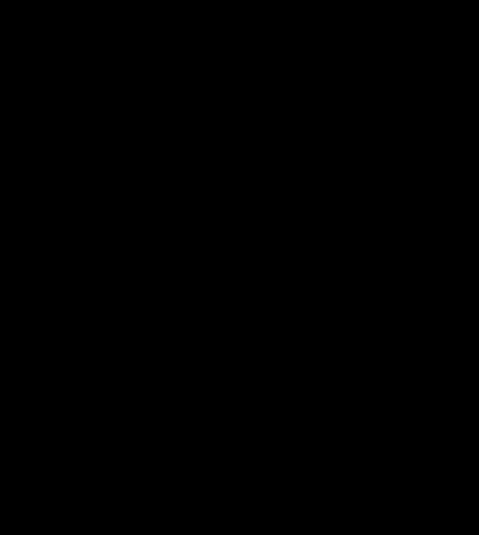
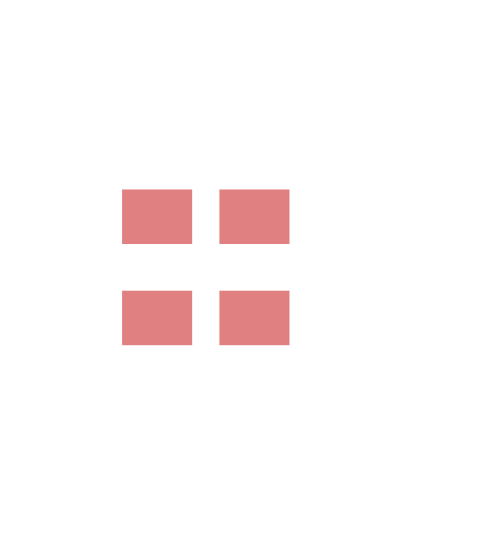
part: none -> (157, 267)
part: none -> (254, 267)

